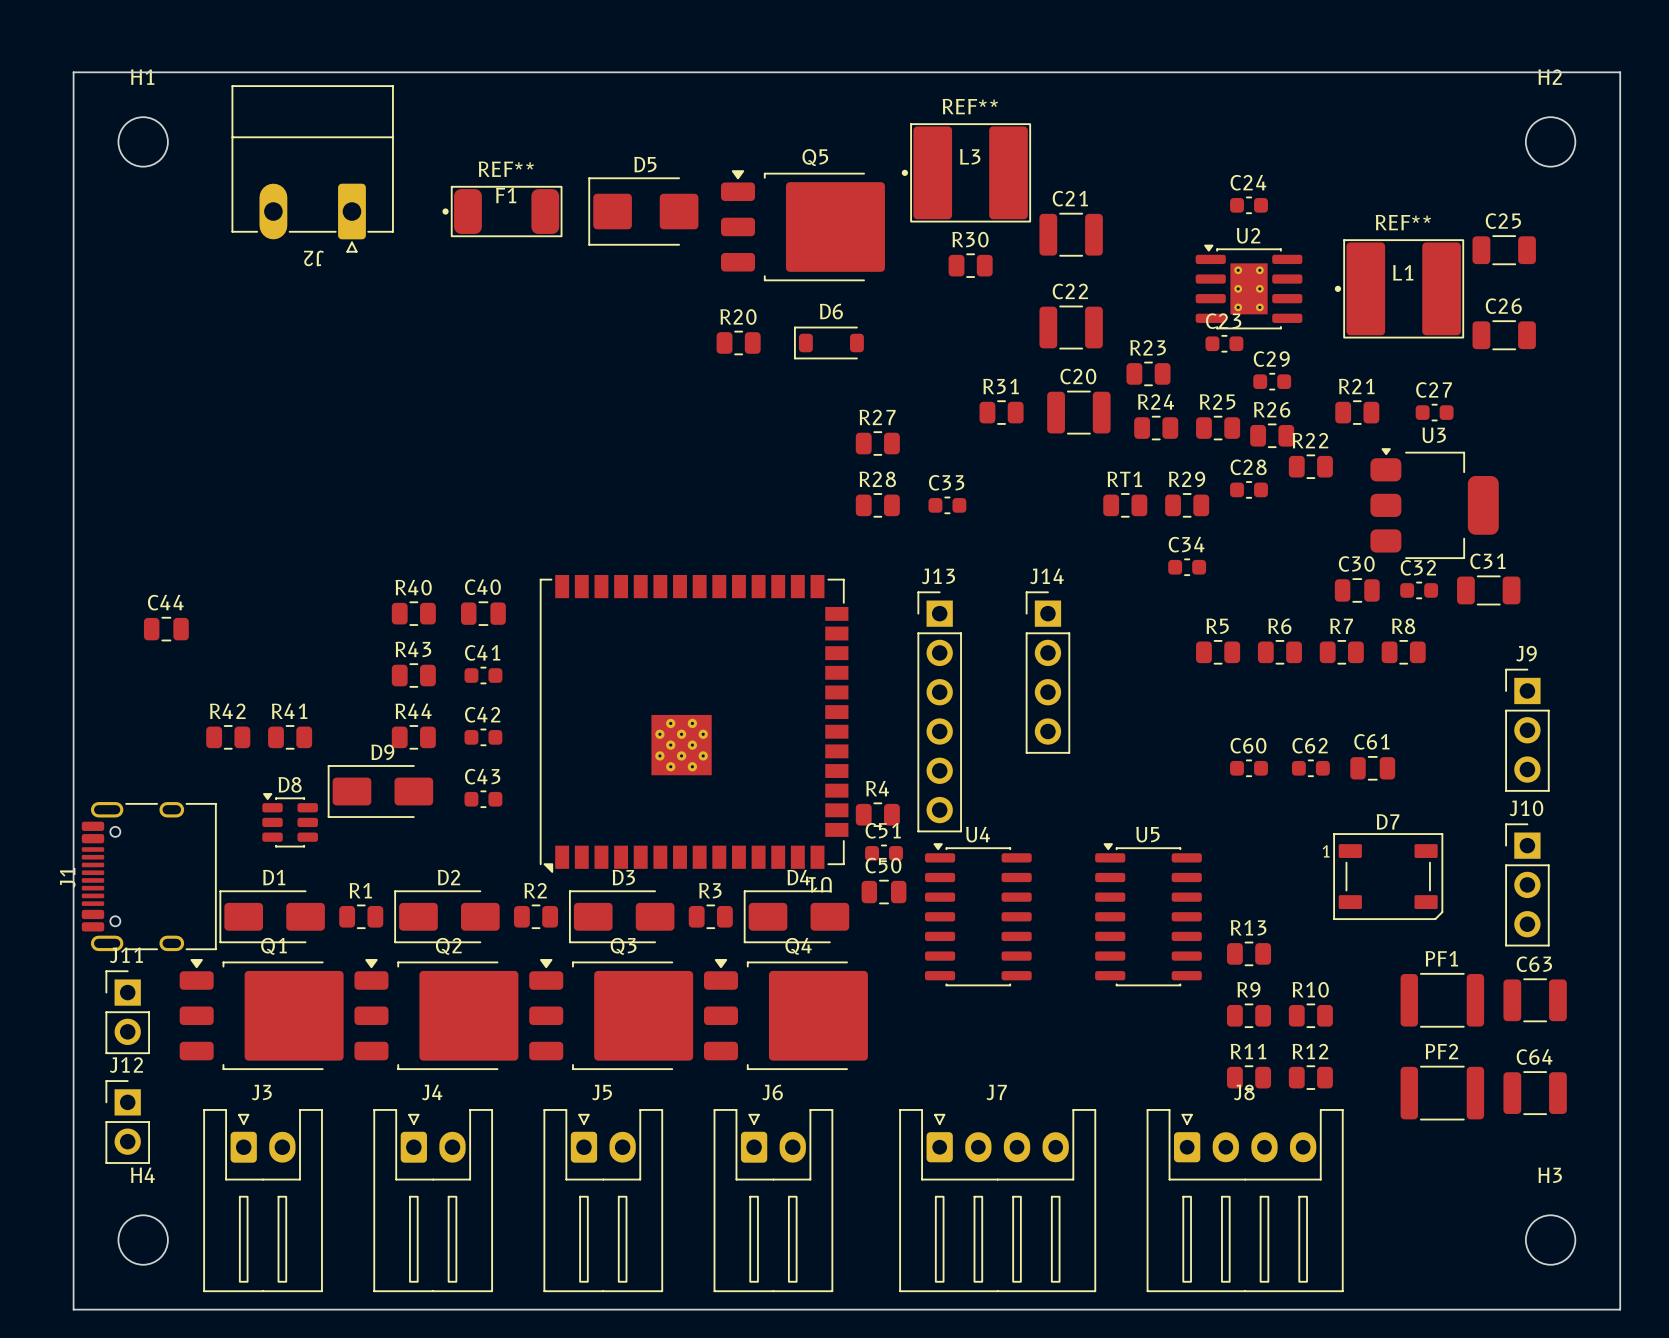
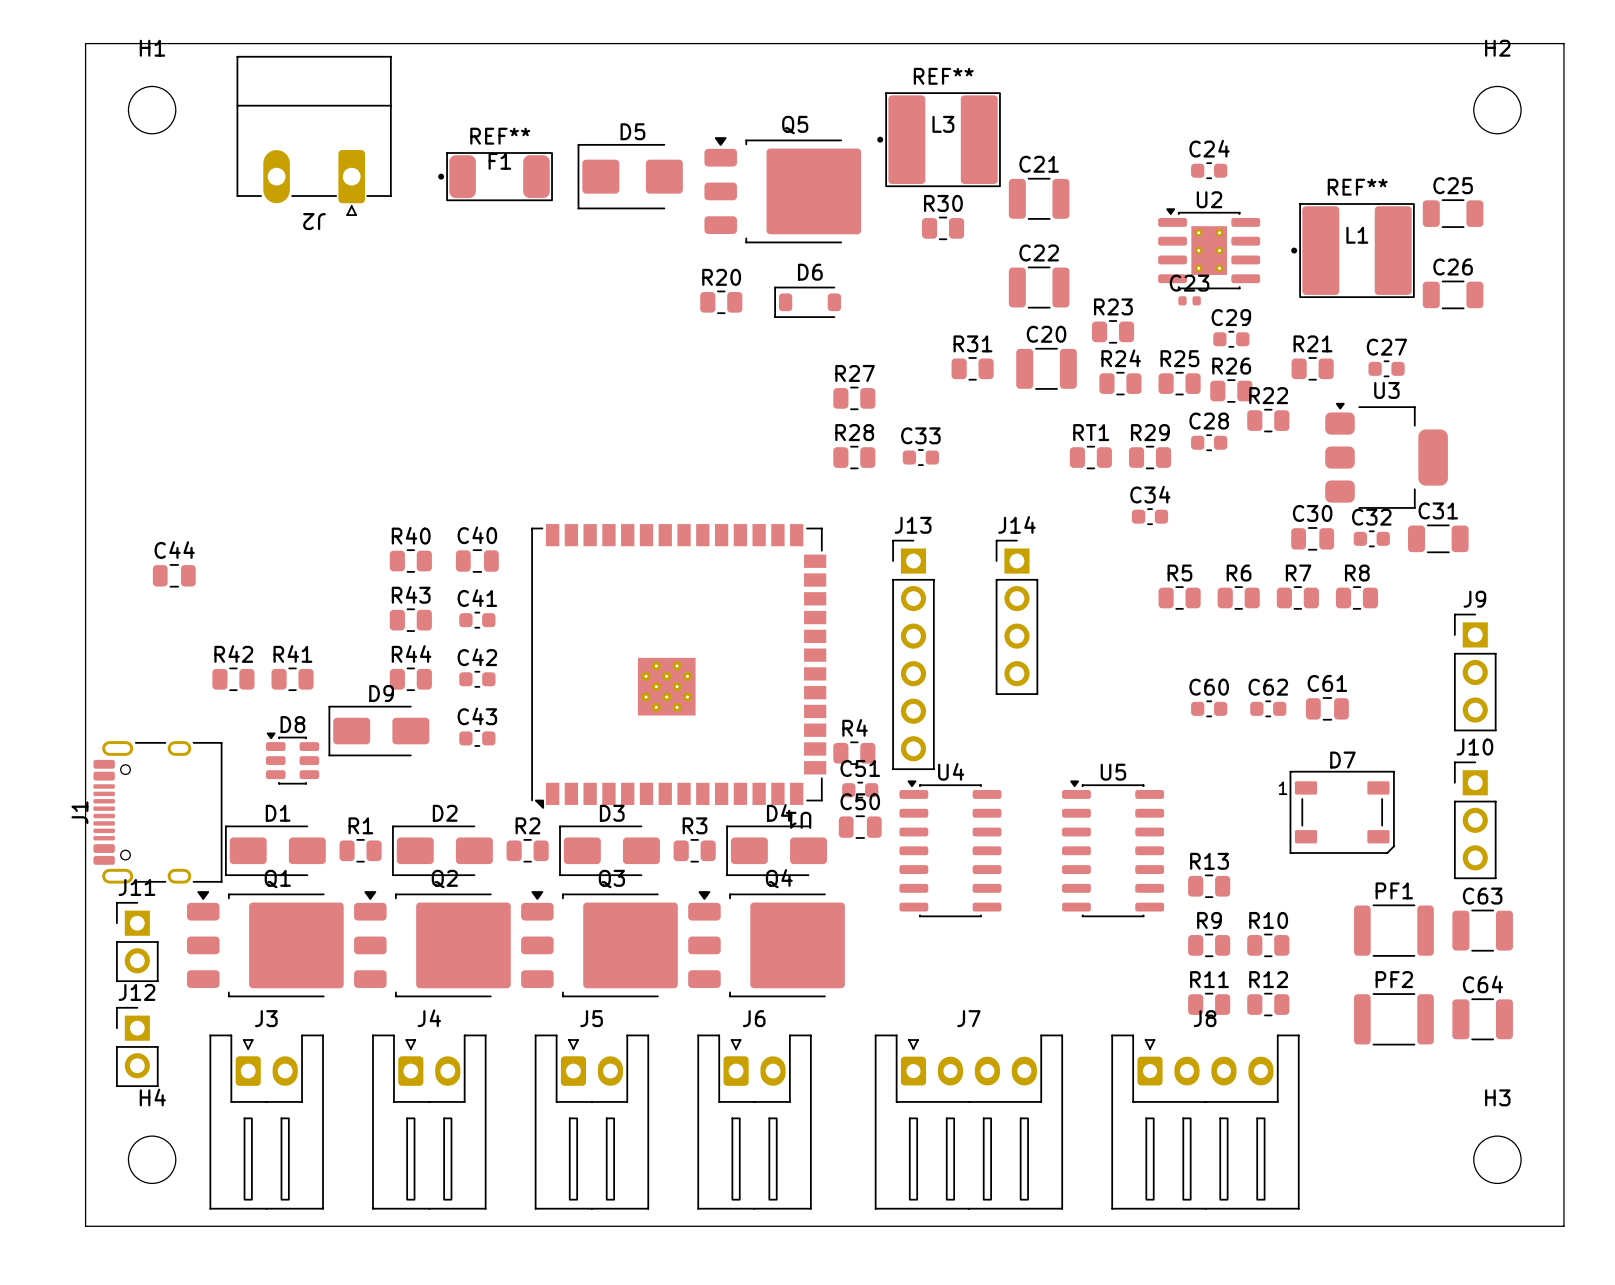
C23 footprint: [1205, 334, 1244, 353] -> [1178, 296, 1201, 306]

